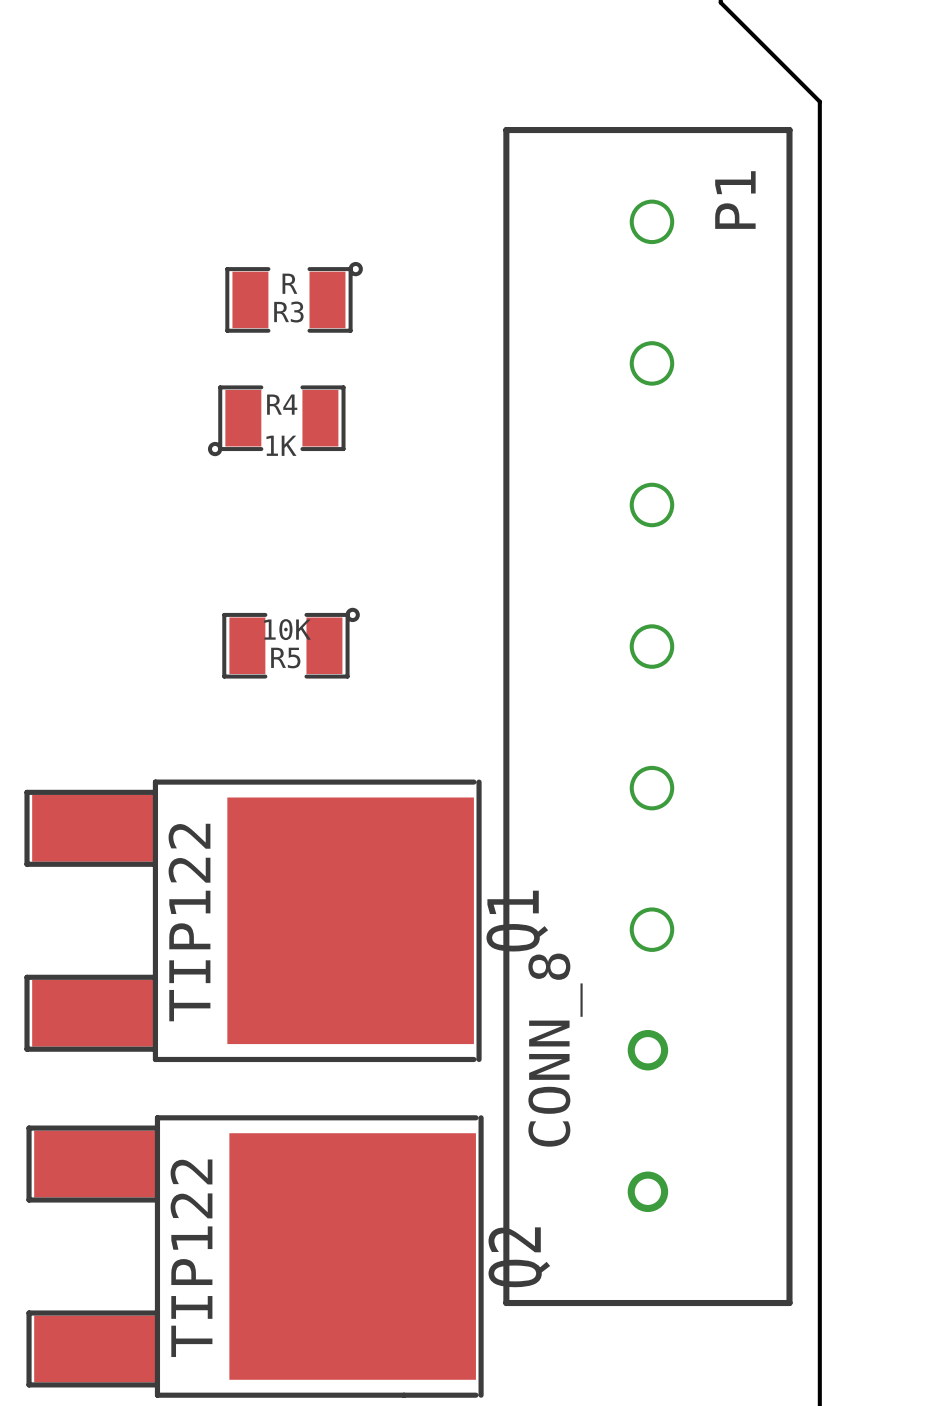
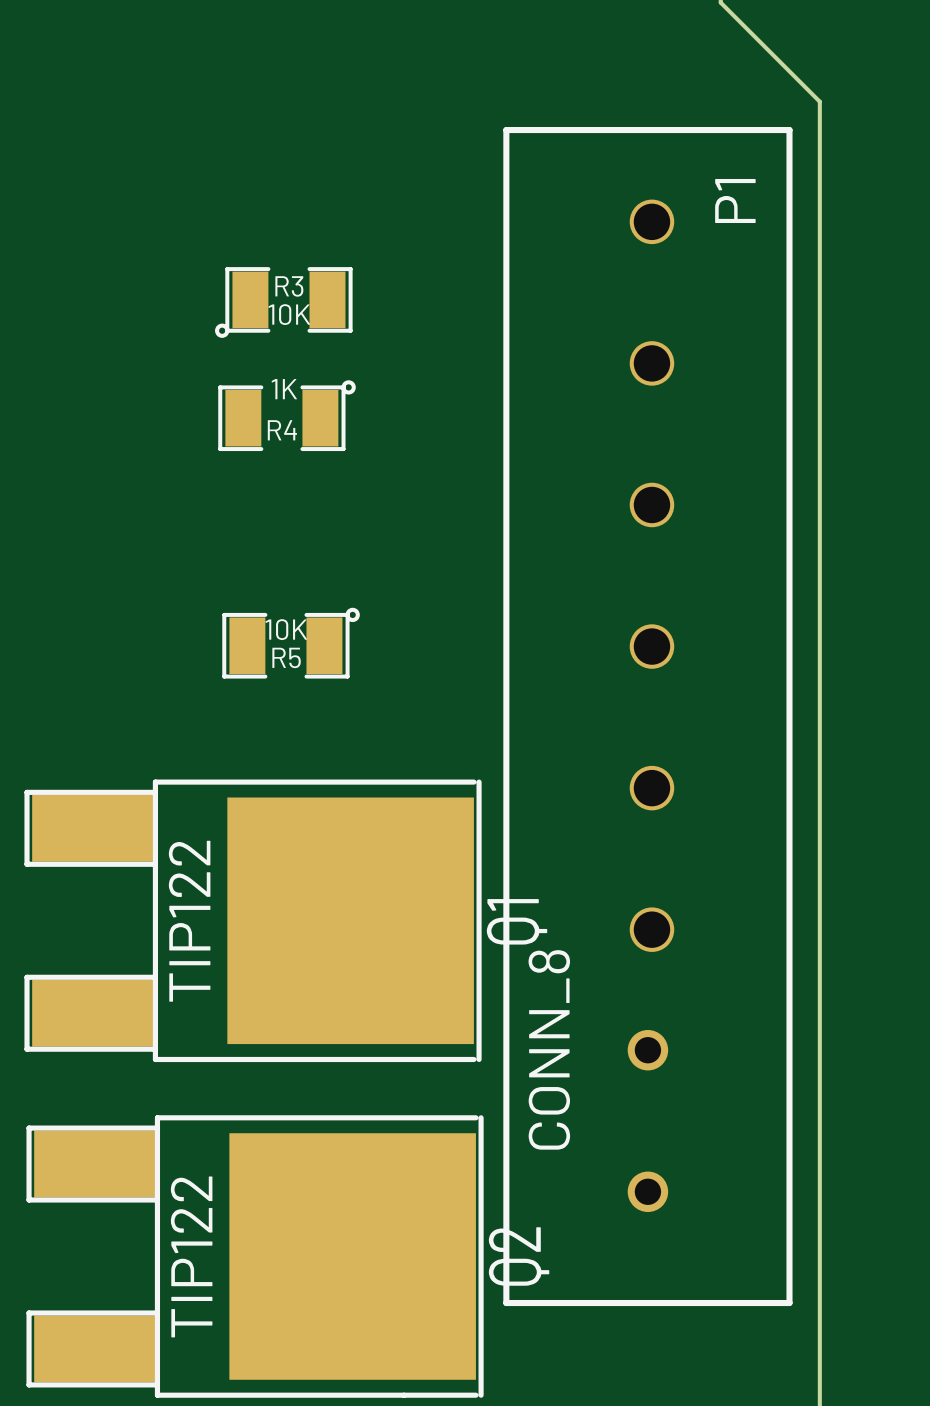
R3 value: R (289, 283) -> 10K (289, 314)
R3 rotation: 0° (294, 297) -> 180° (283, 302)
R4 rotation: 0° (276, 420) -> 180° (287, 415)

